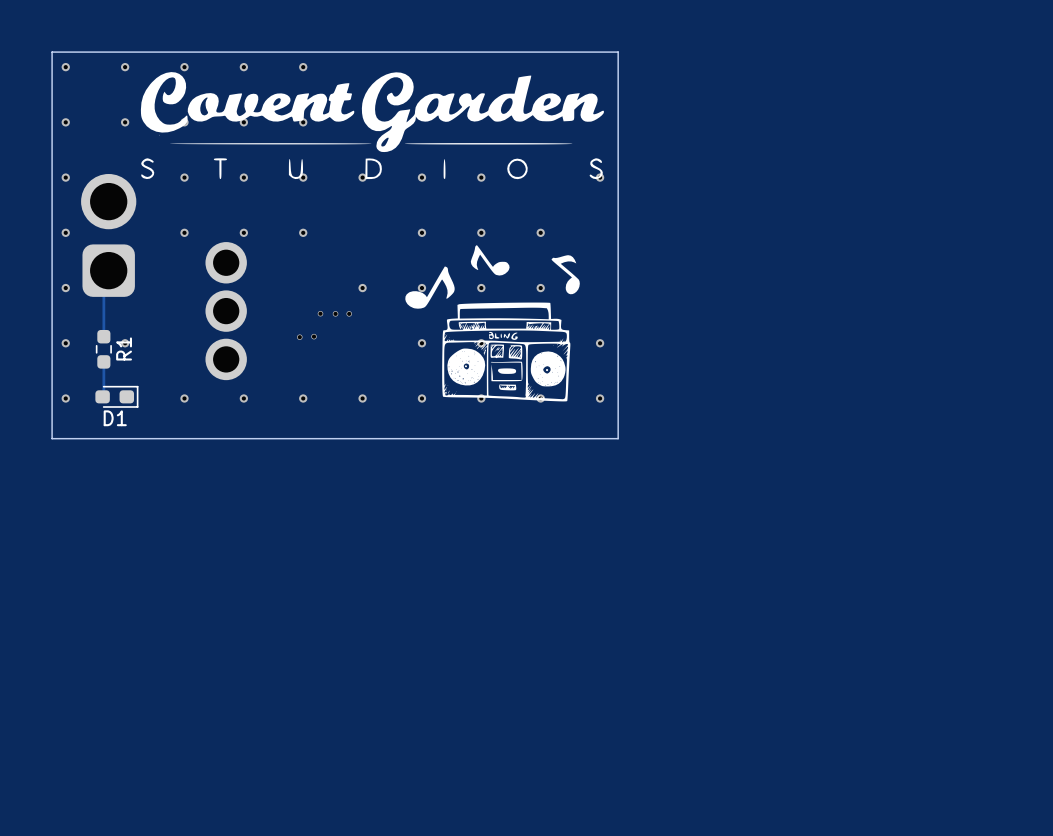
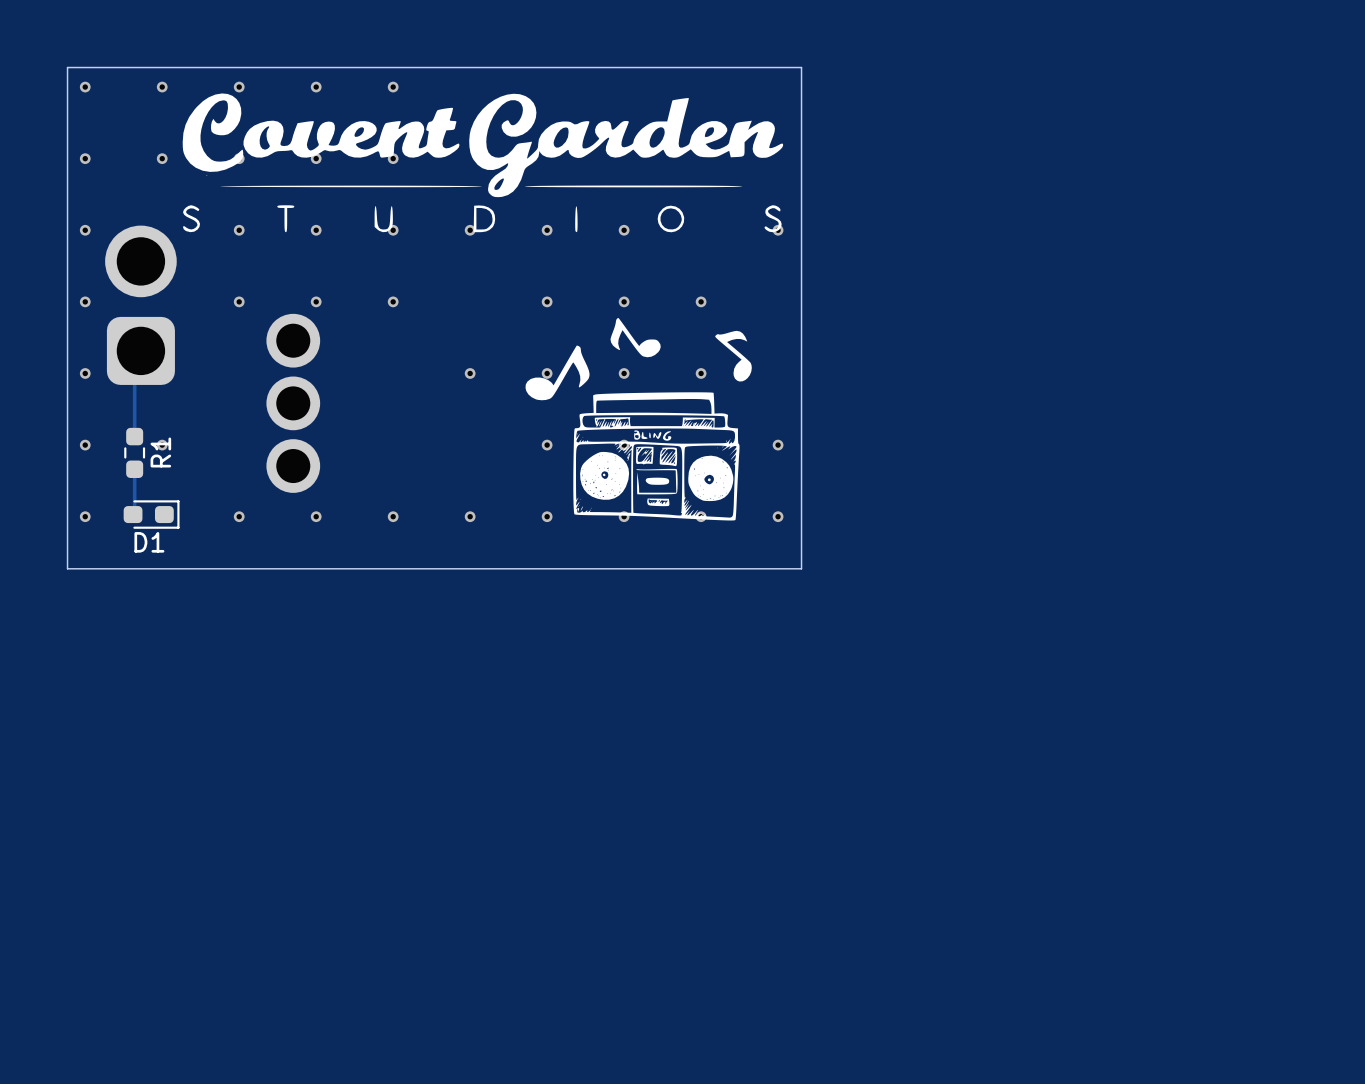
via: (320, 313) -> none
via: (335, 313) -> none
via: (349, 313) -> none
via: (314, 336) -> none
via: (299, 337) -> none

